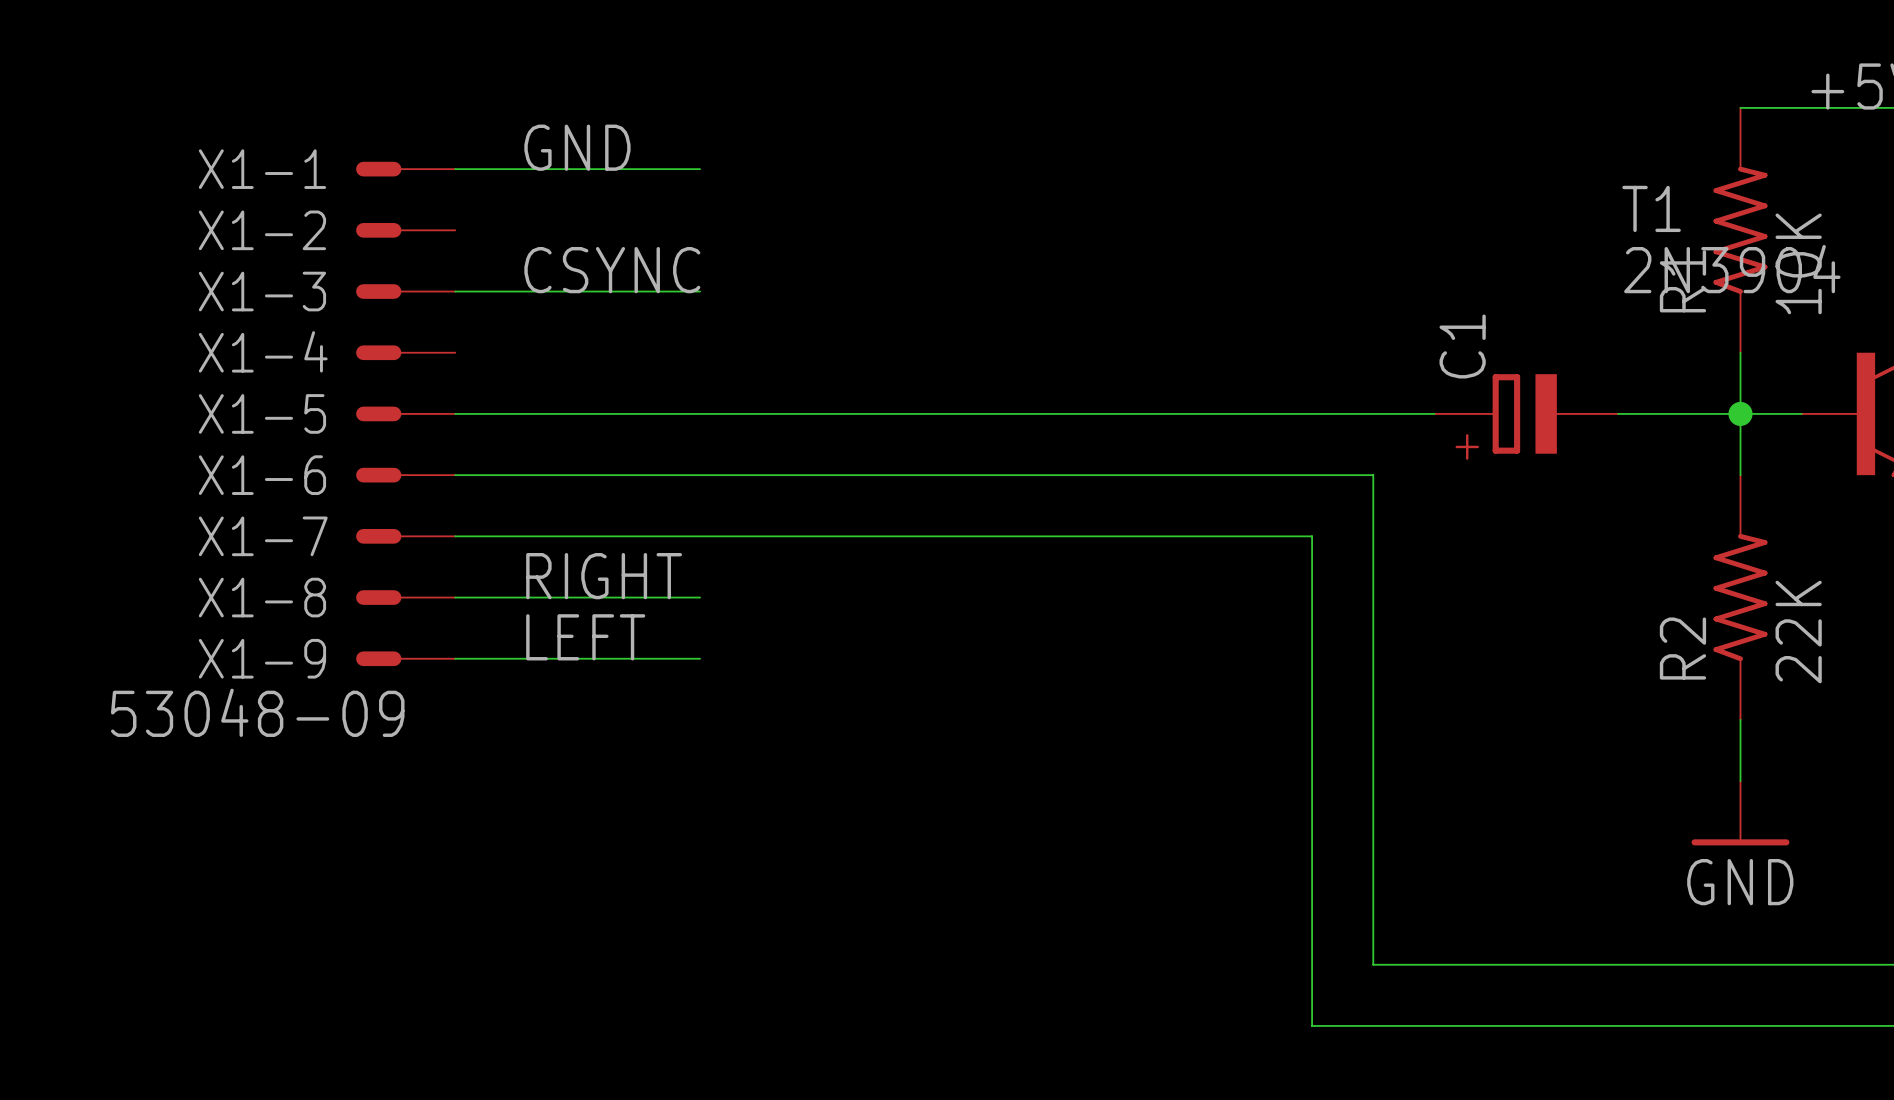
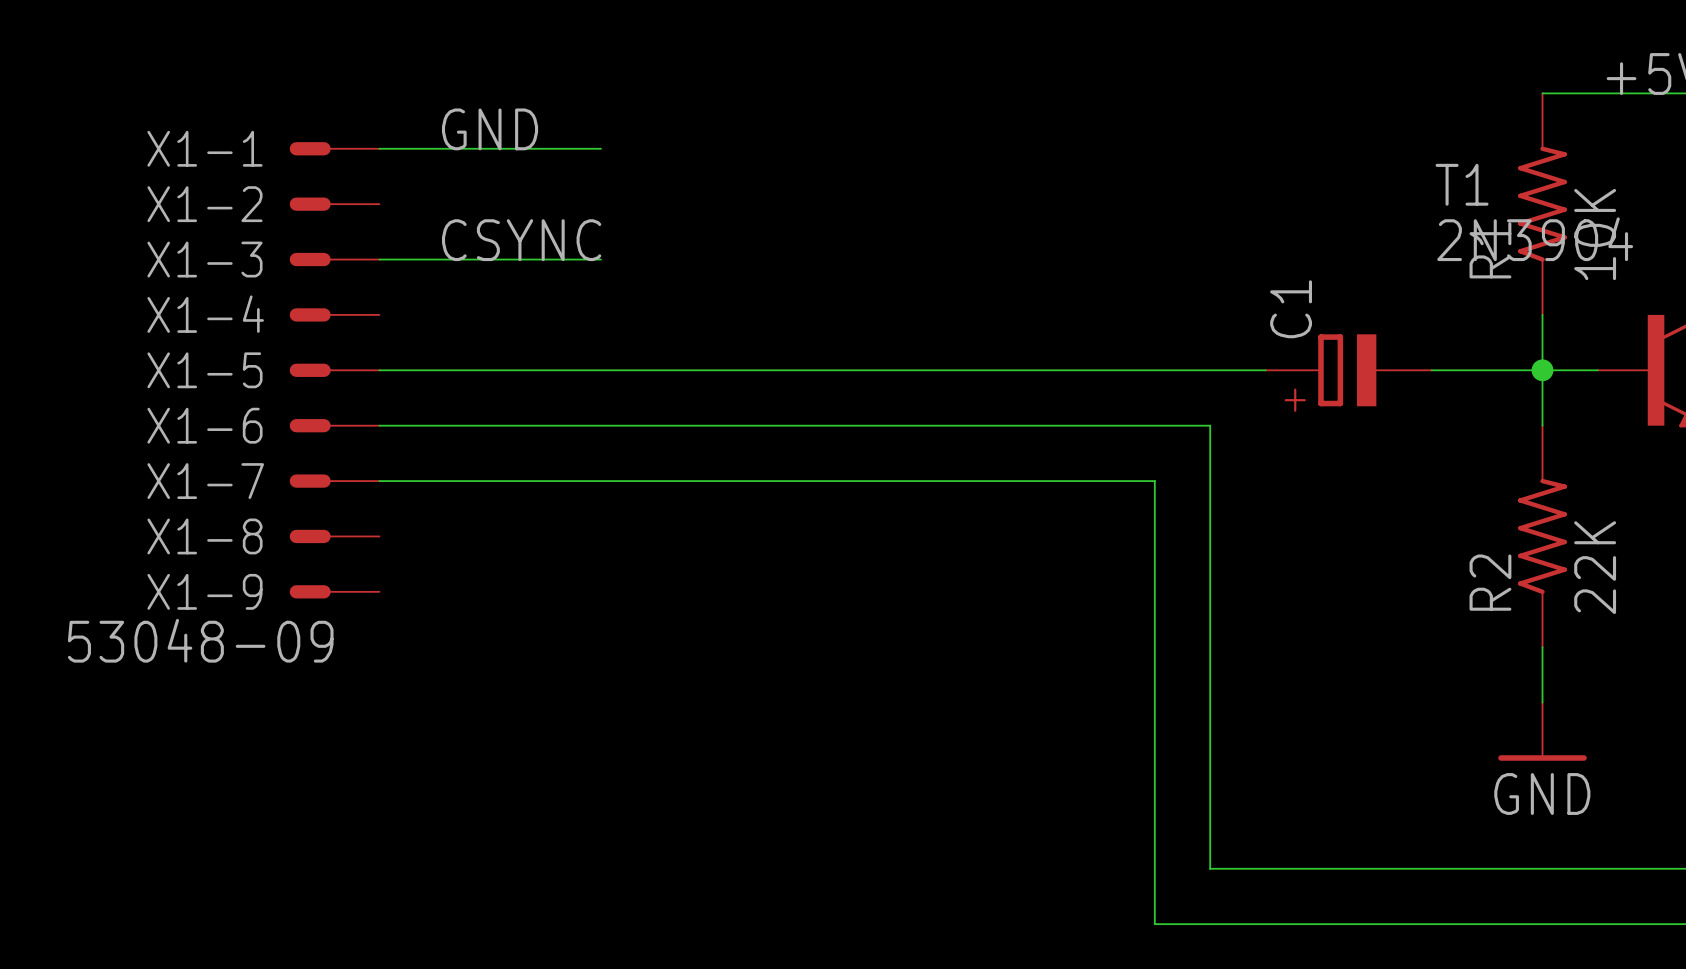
label: RIGHT (604, 576) -> none
wire: (455, 597) (700, 597) -> none
label: LEFT (585, 637) -> none
wire: (455, 658) (700, 658) -> none

